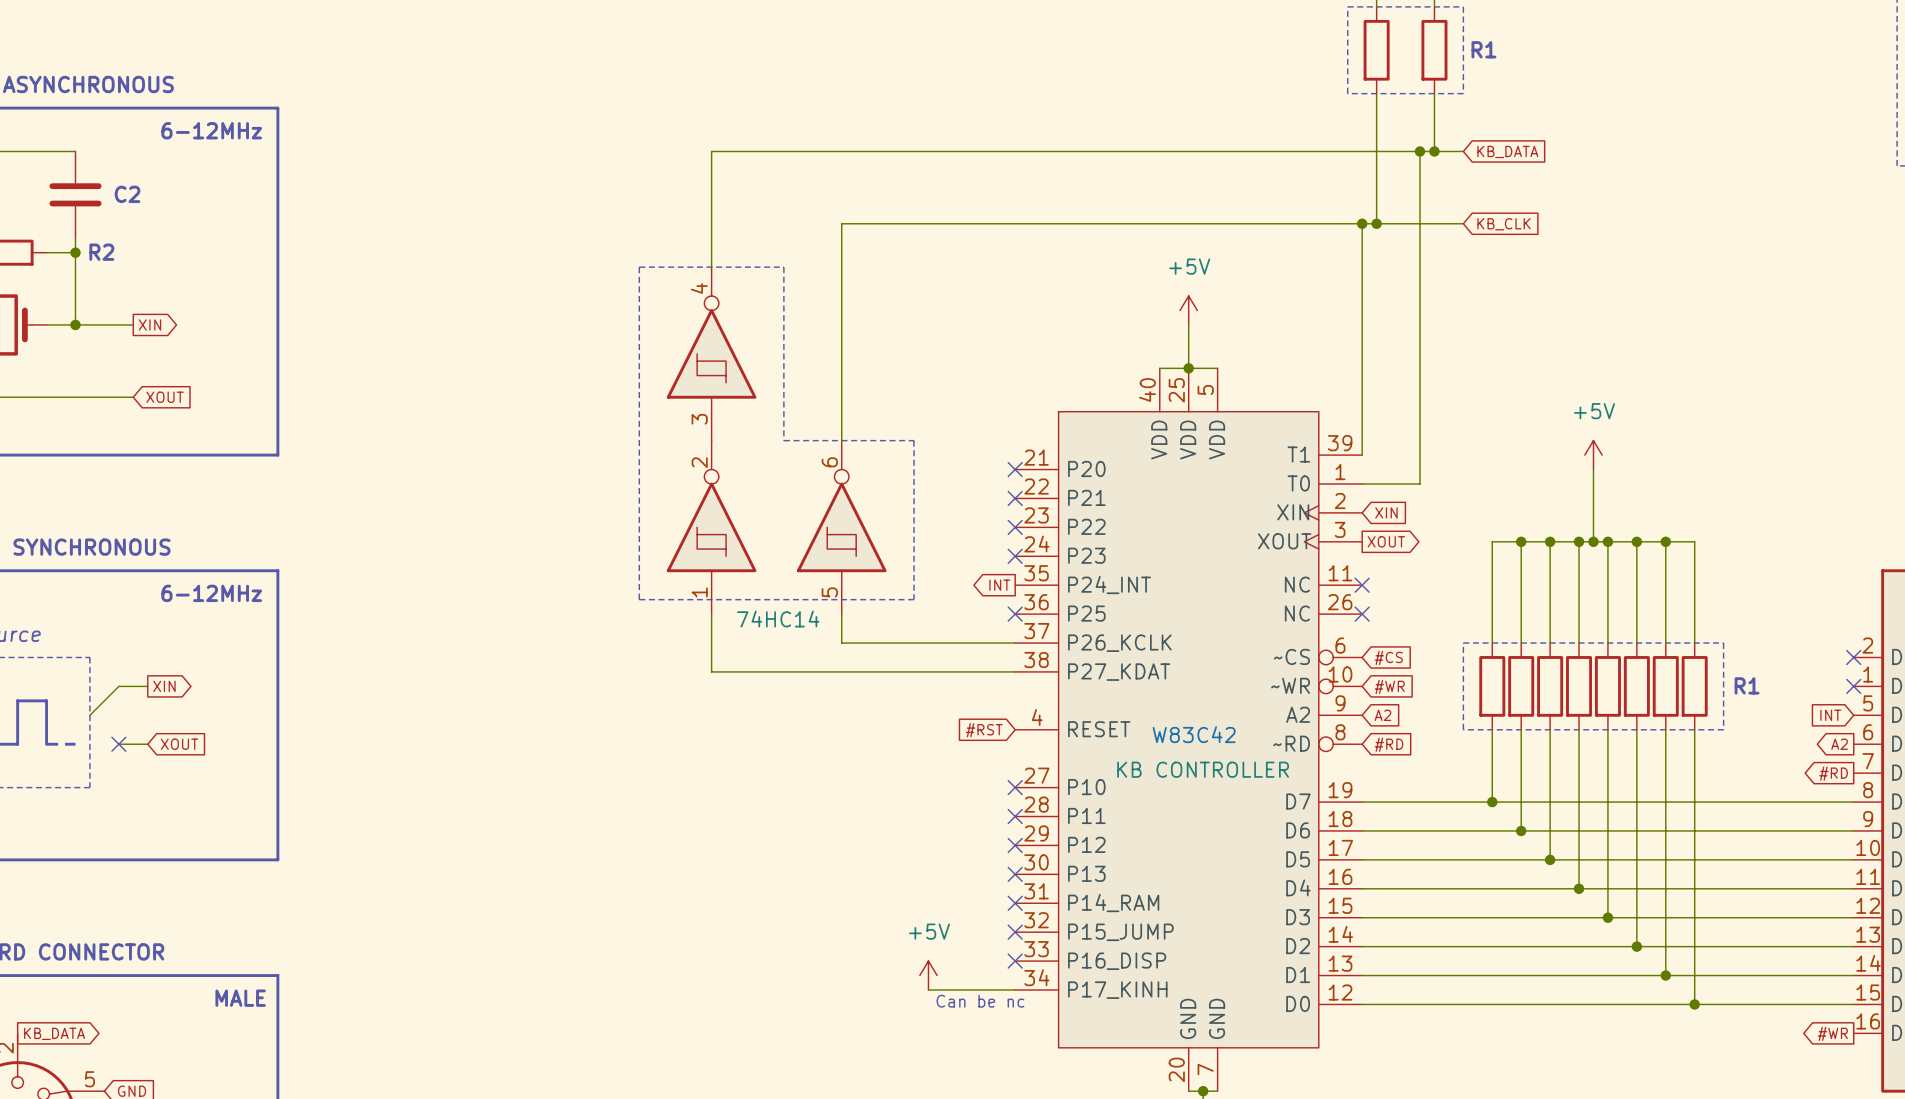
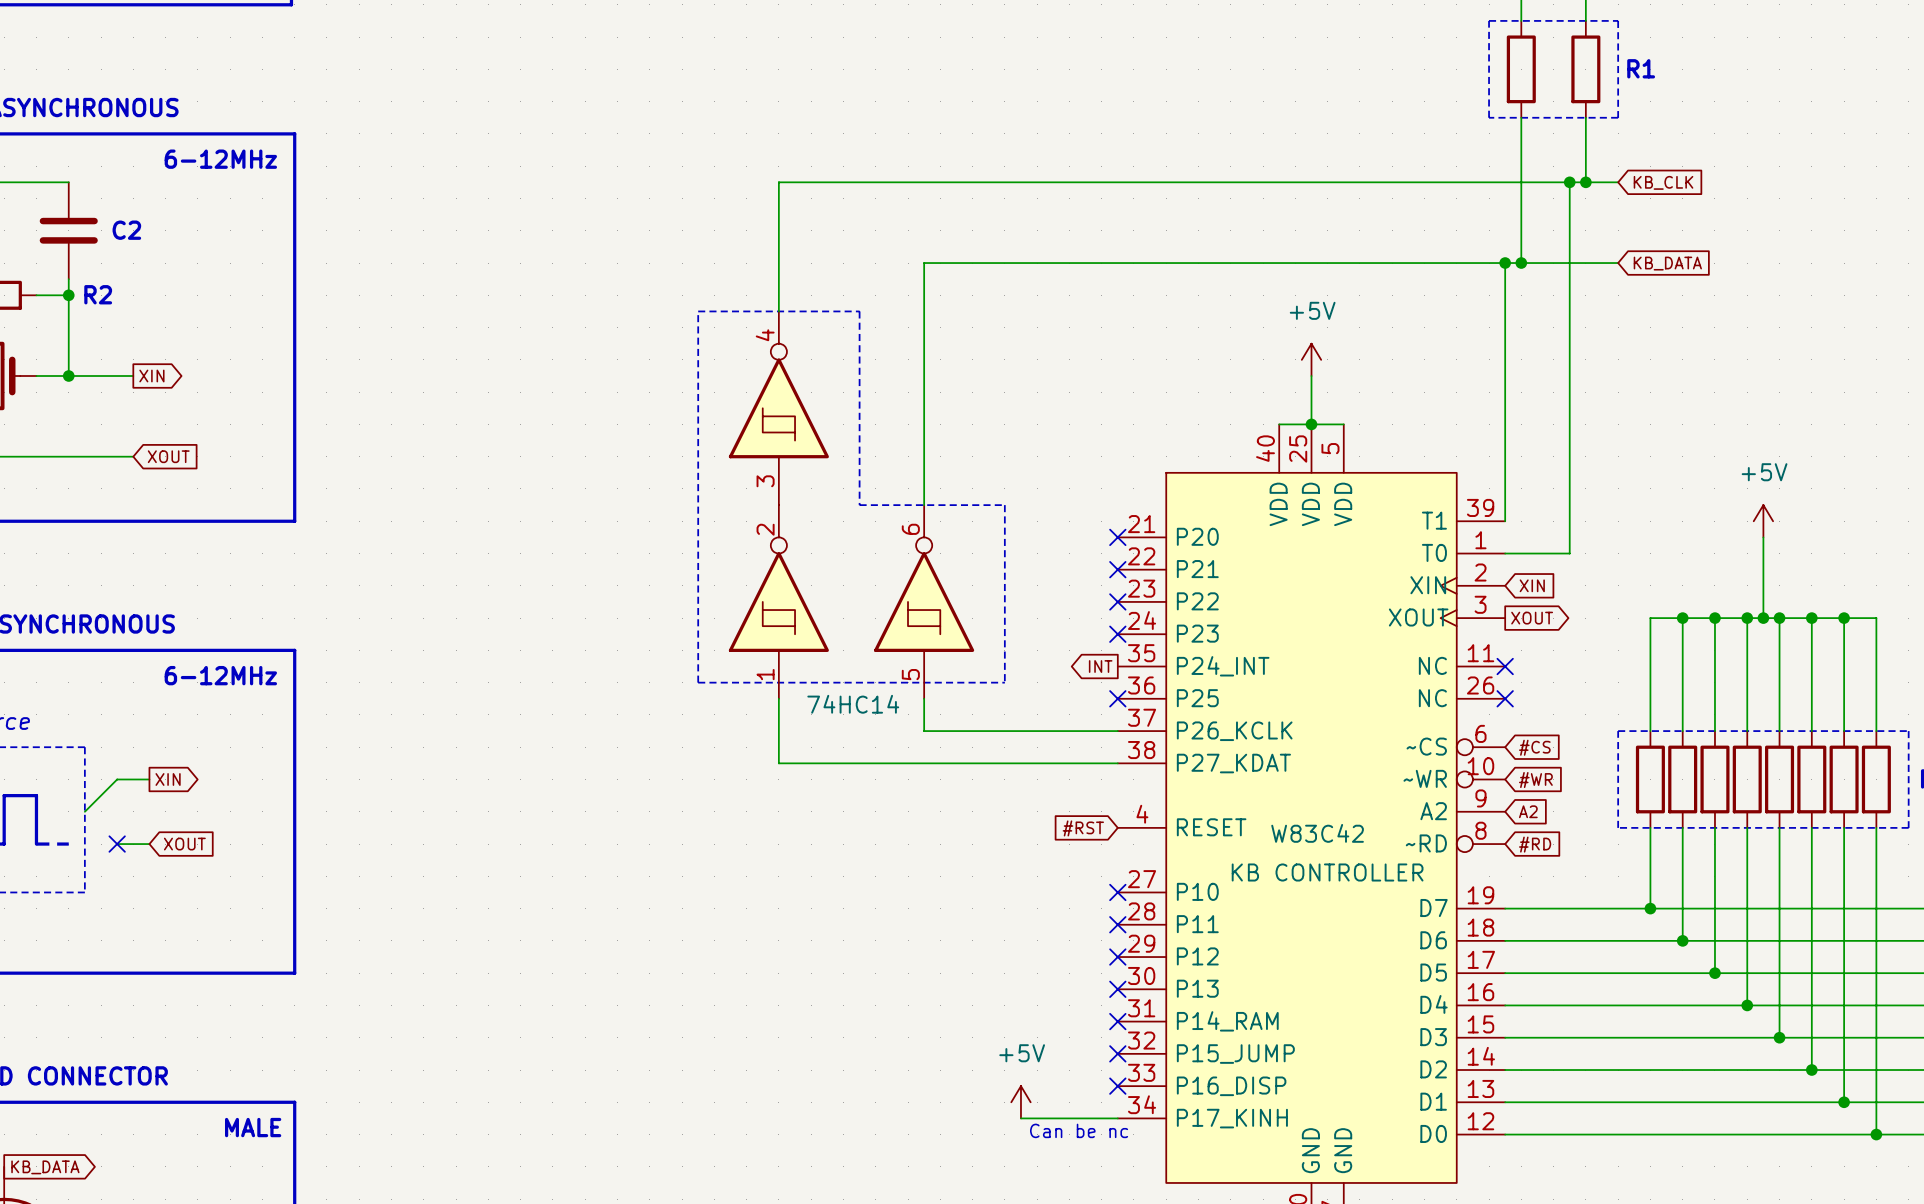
global label: KB_DATA (1507, 151) -> KB_CLK (1663, 182)
global label: KB_CLK (1504, 224) -> KB_DATA (1667, 263)

